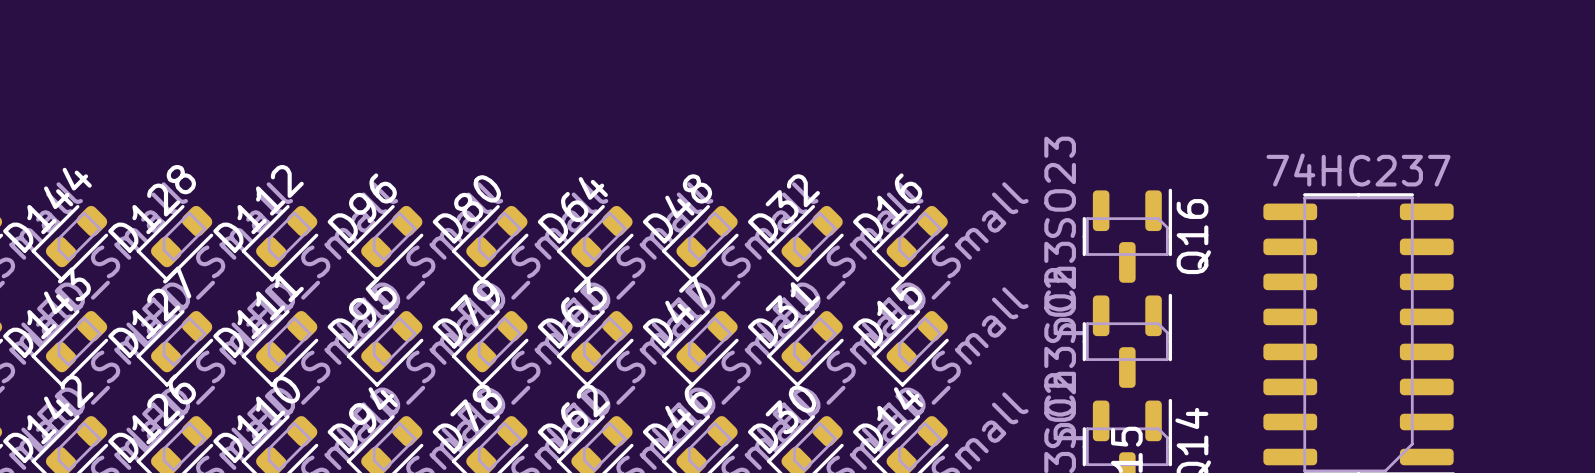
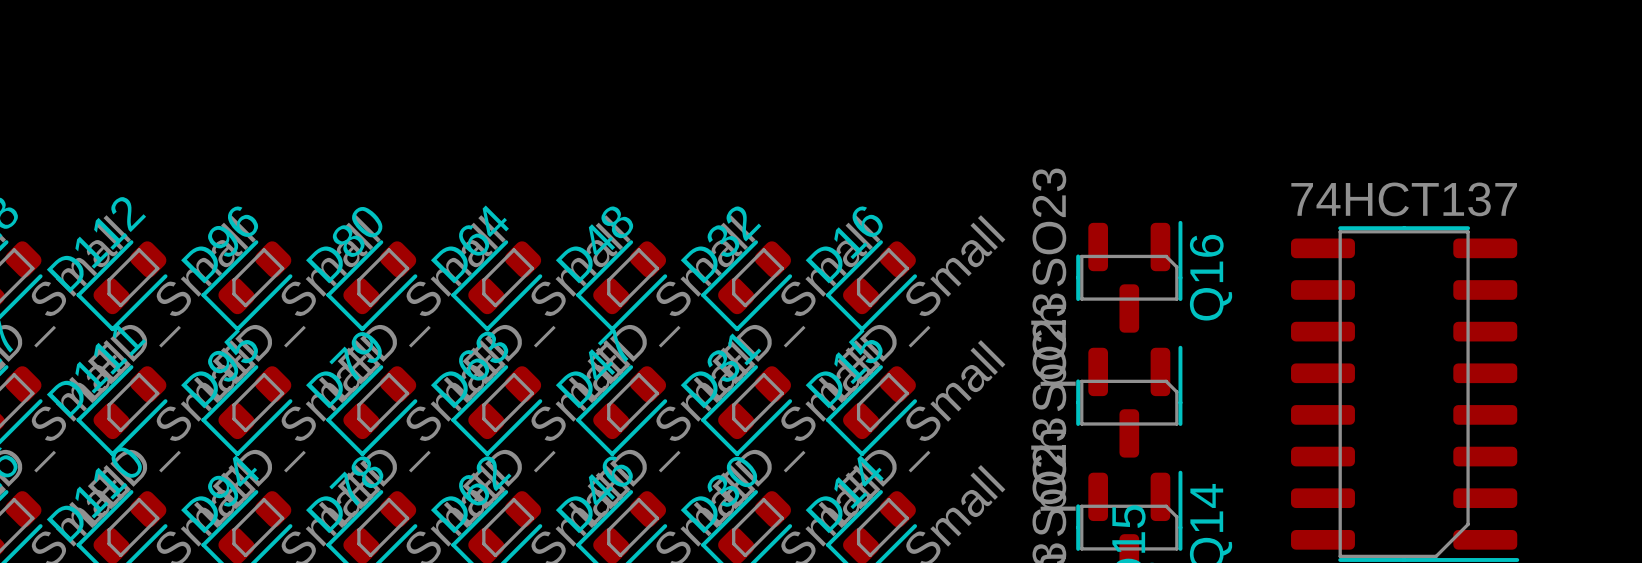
part value: 74HC237 (1358, 170) -> 74HCT137 (1404, 199)

